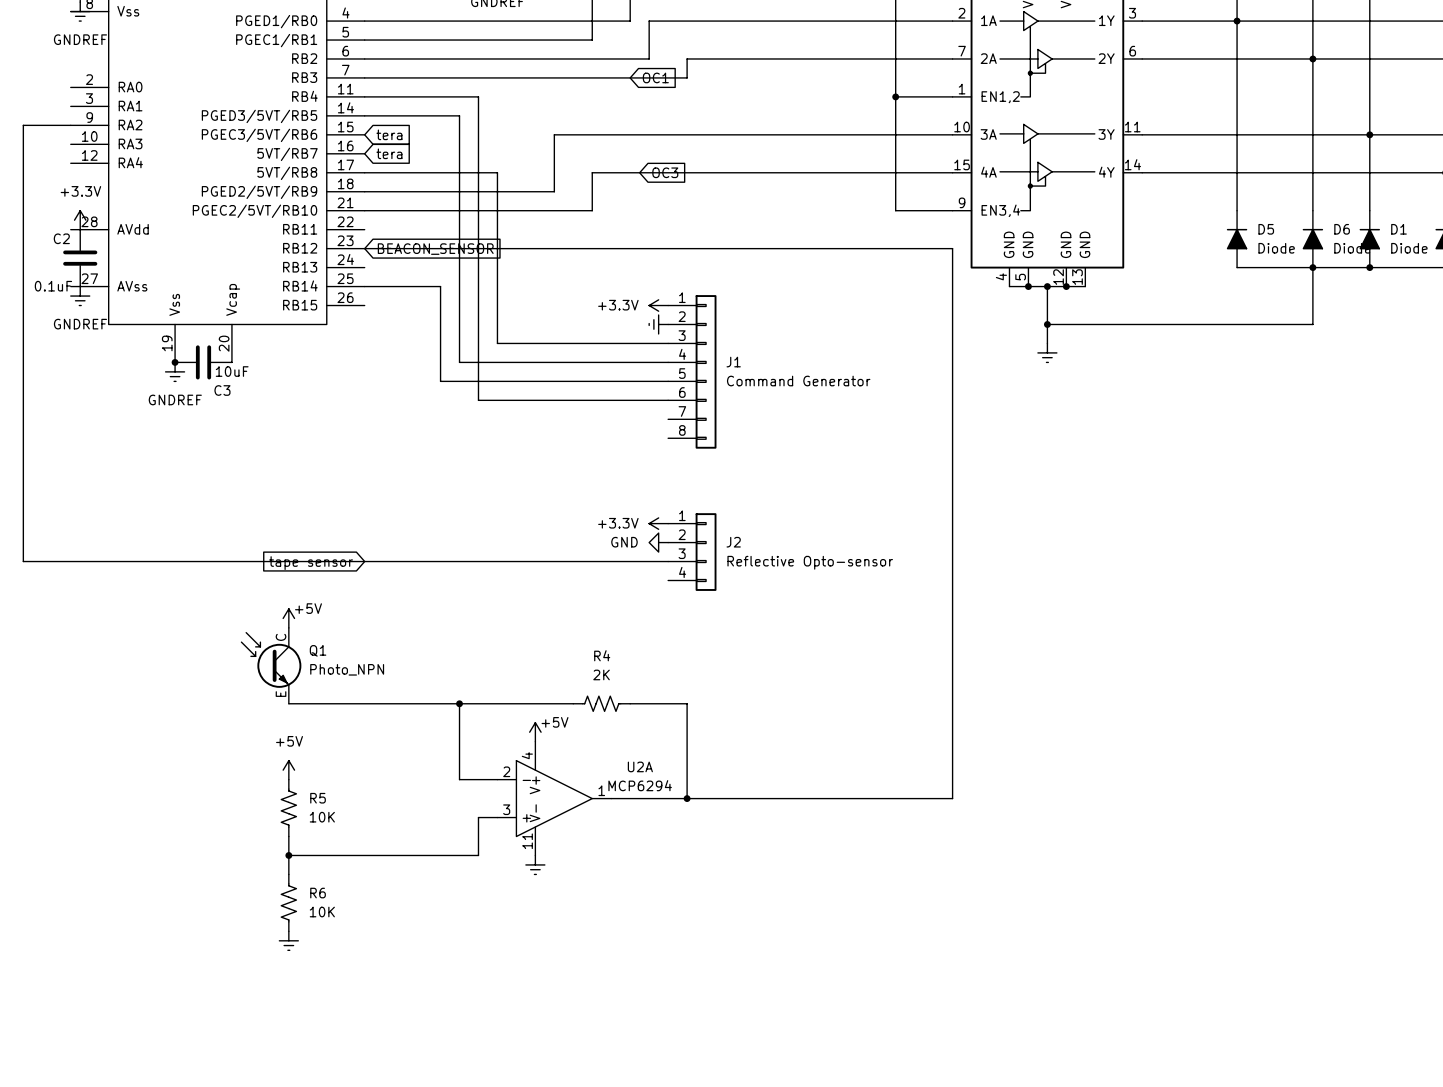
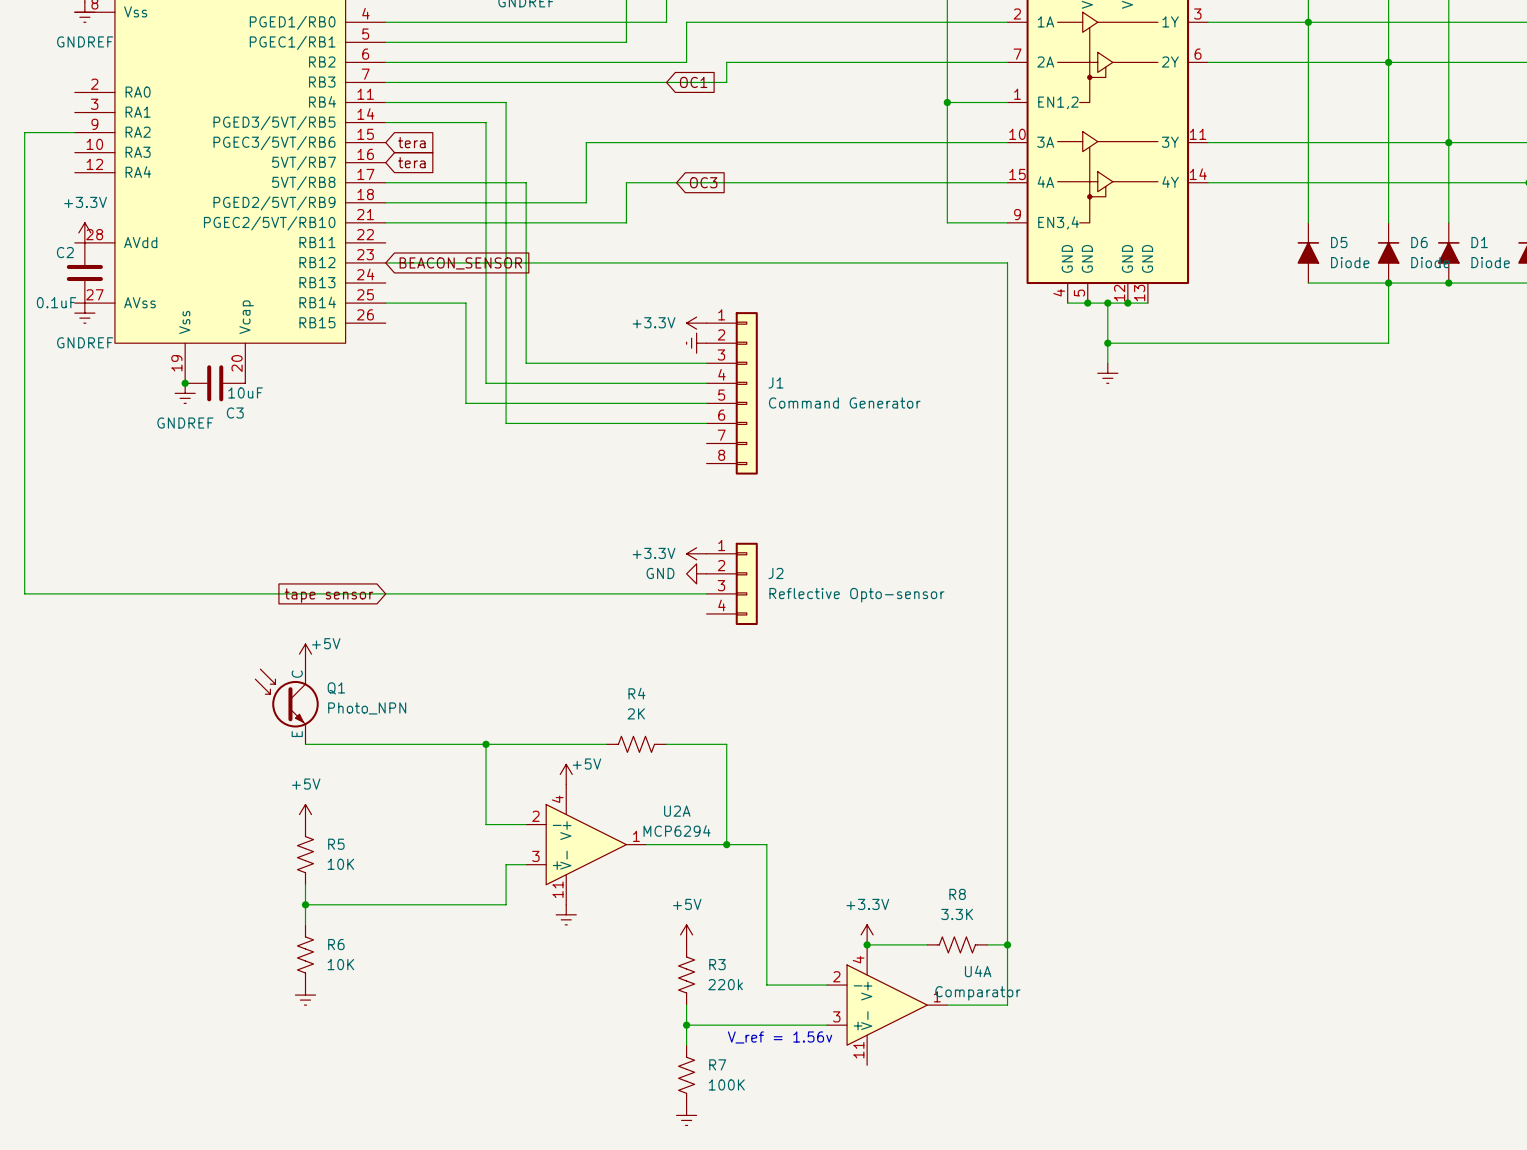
wire: (725, 798) (952, 798) -> (766, 844) (766, 985) (826, 985)
wire: none -> (1007, 844) (1007, 1005) (947, 1005)
power symbol: none -> +5V (686, 934)
power symbol: none -> +3.3V (867, 934)
wire: none -> (867, 944) (927, 944)
junction: none -> (867, 944)
R8: none -> 3.3K (957, 944)
wire: none -> (987, 944) (1007, 944)
junction: none -> (1007, 944)
R3: none -> 220k (686, 975)
wire: none -> (686, 1005) (686, 1045)
U4A: none -> Comparator (887, 1005)
wire: none -> (686, 1025) (826, 1025)
junction: none -> (686, 1025)
text: none -> V_ref = 1.56v (780, 1037)
R7: none -> 100K (686, 1075)
power symbol: none -> (686, 1115)

